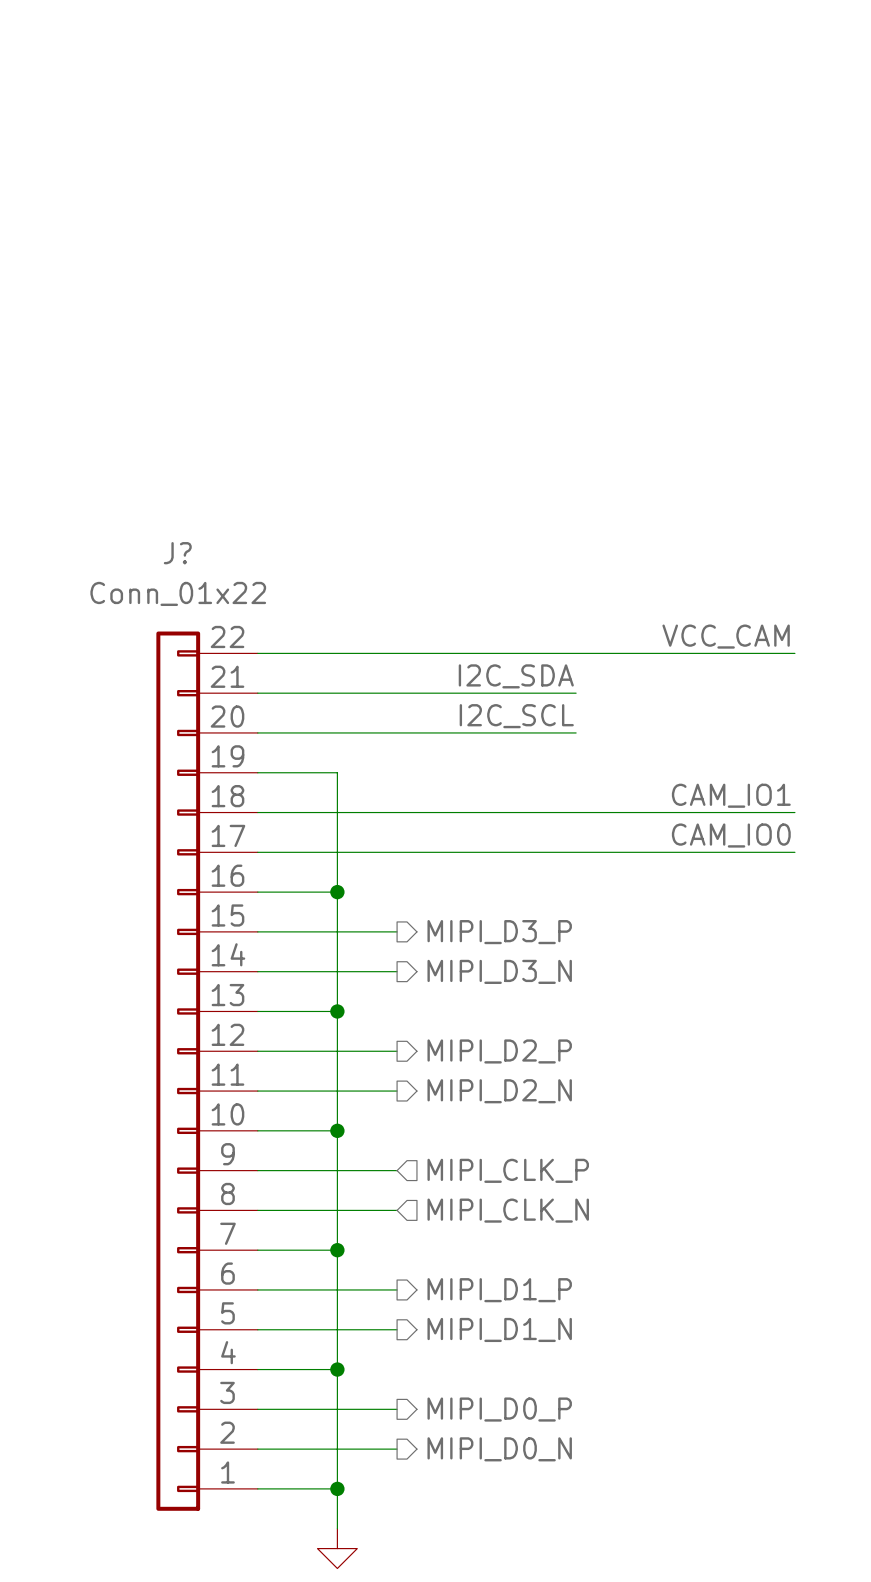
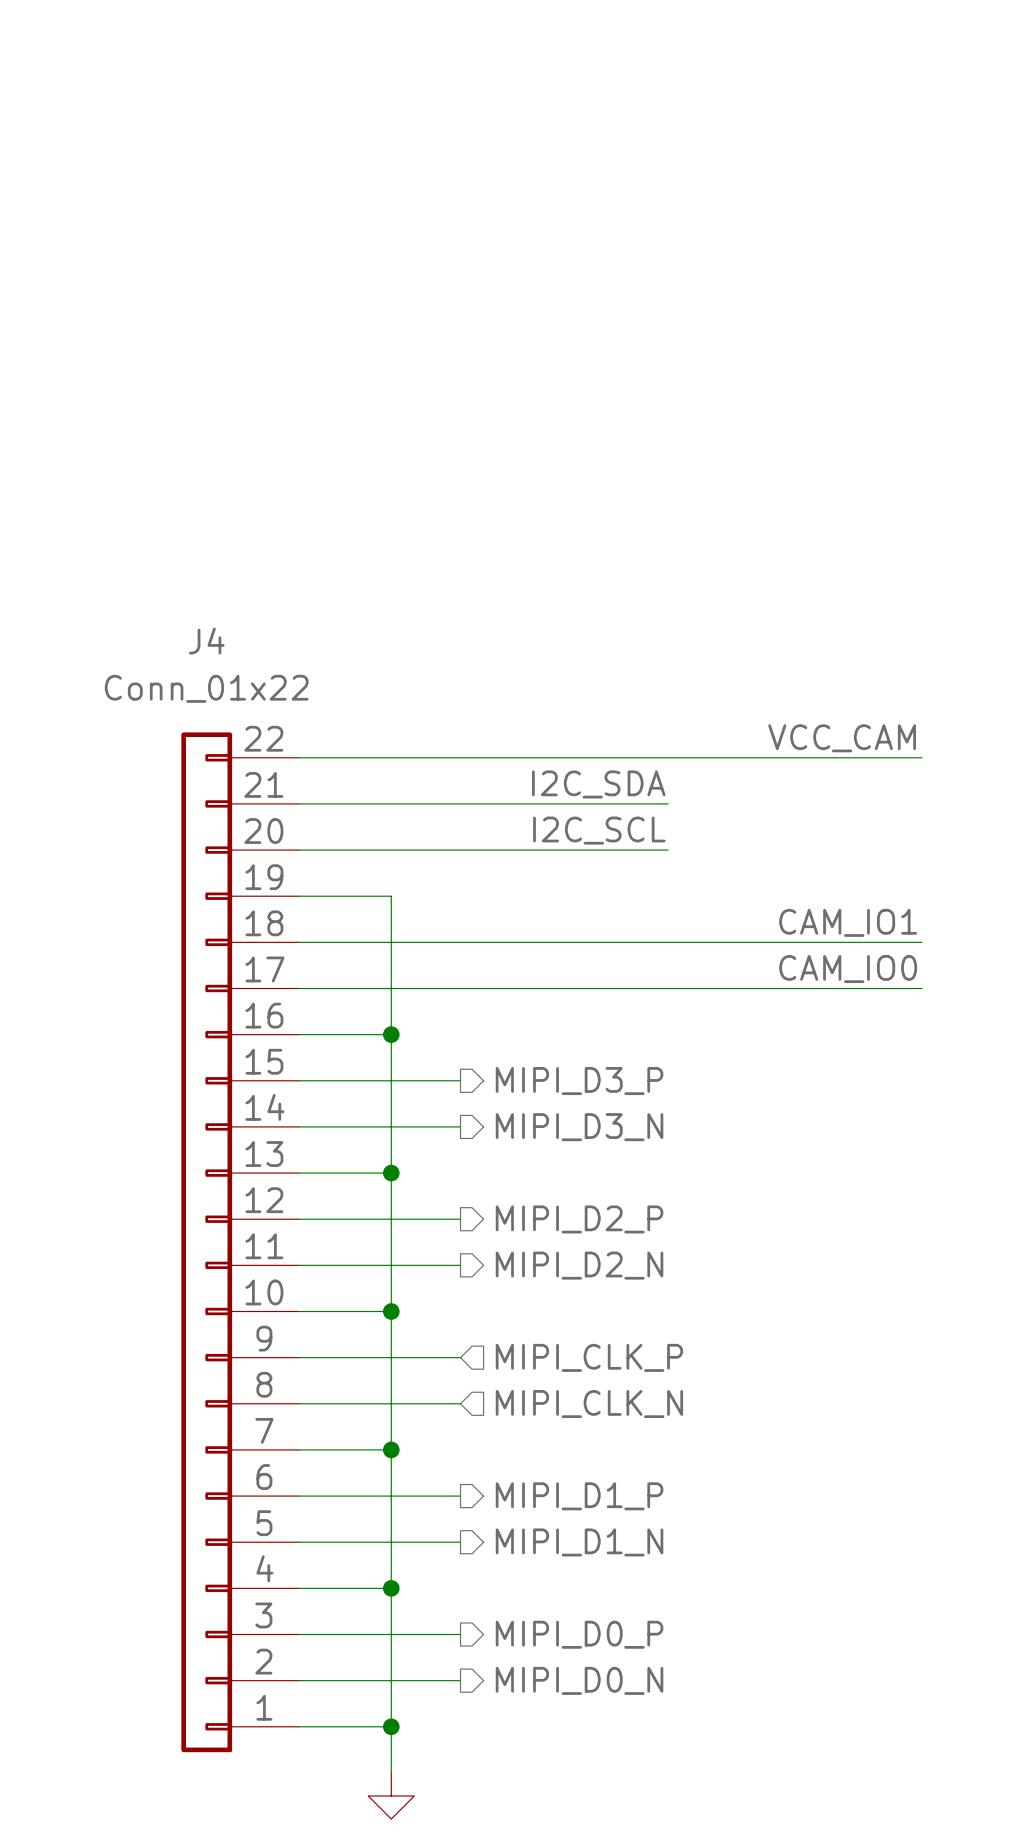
J? name: J? (177, 553) -> J4 (206, 641)

